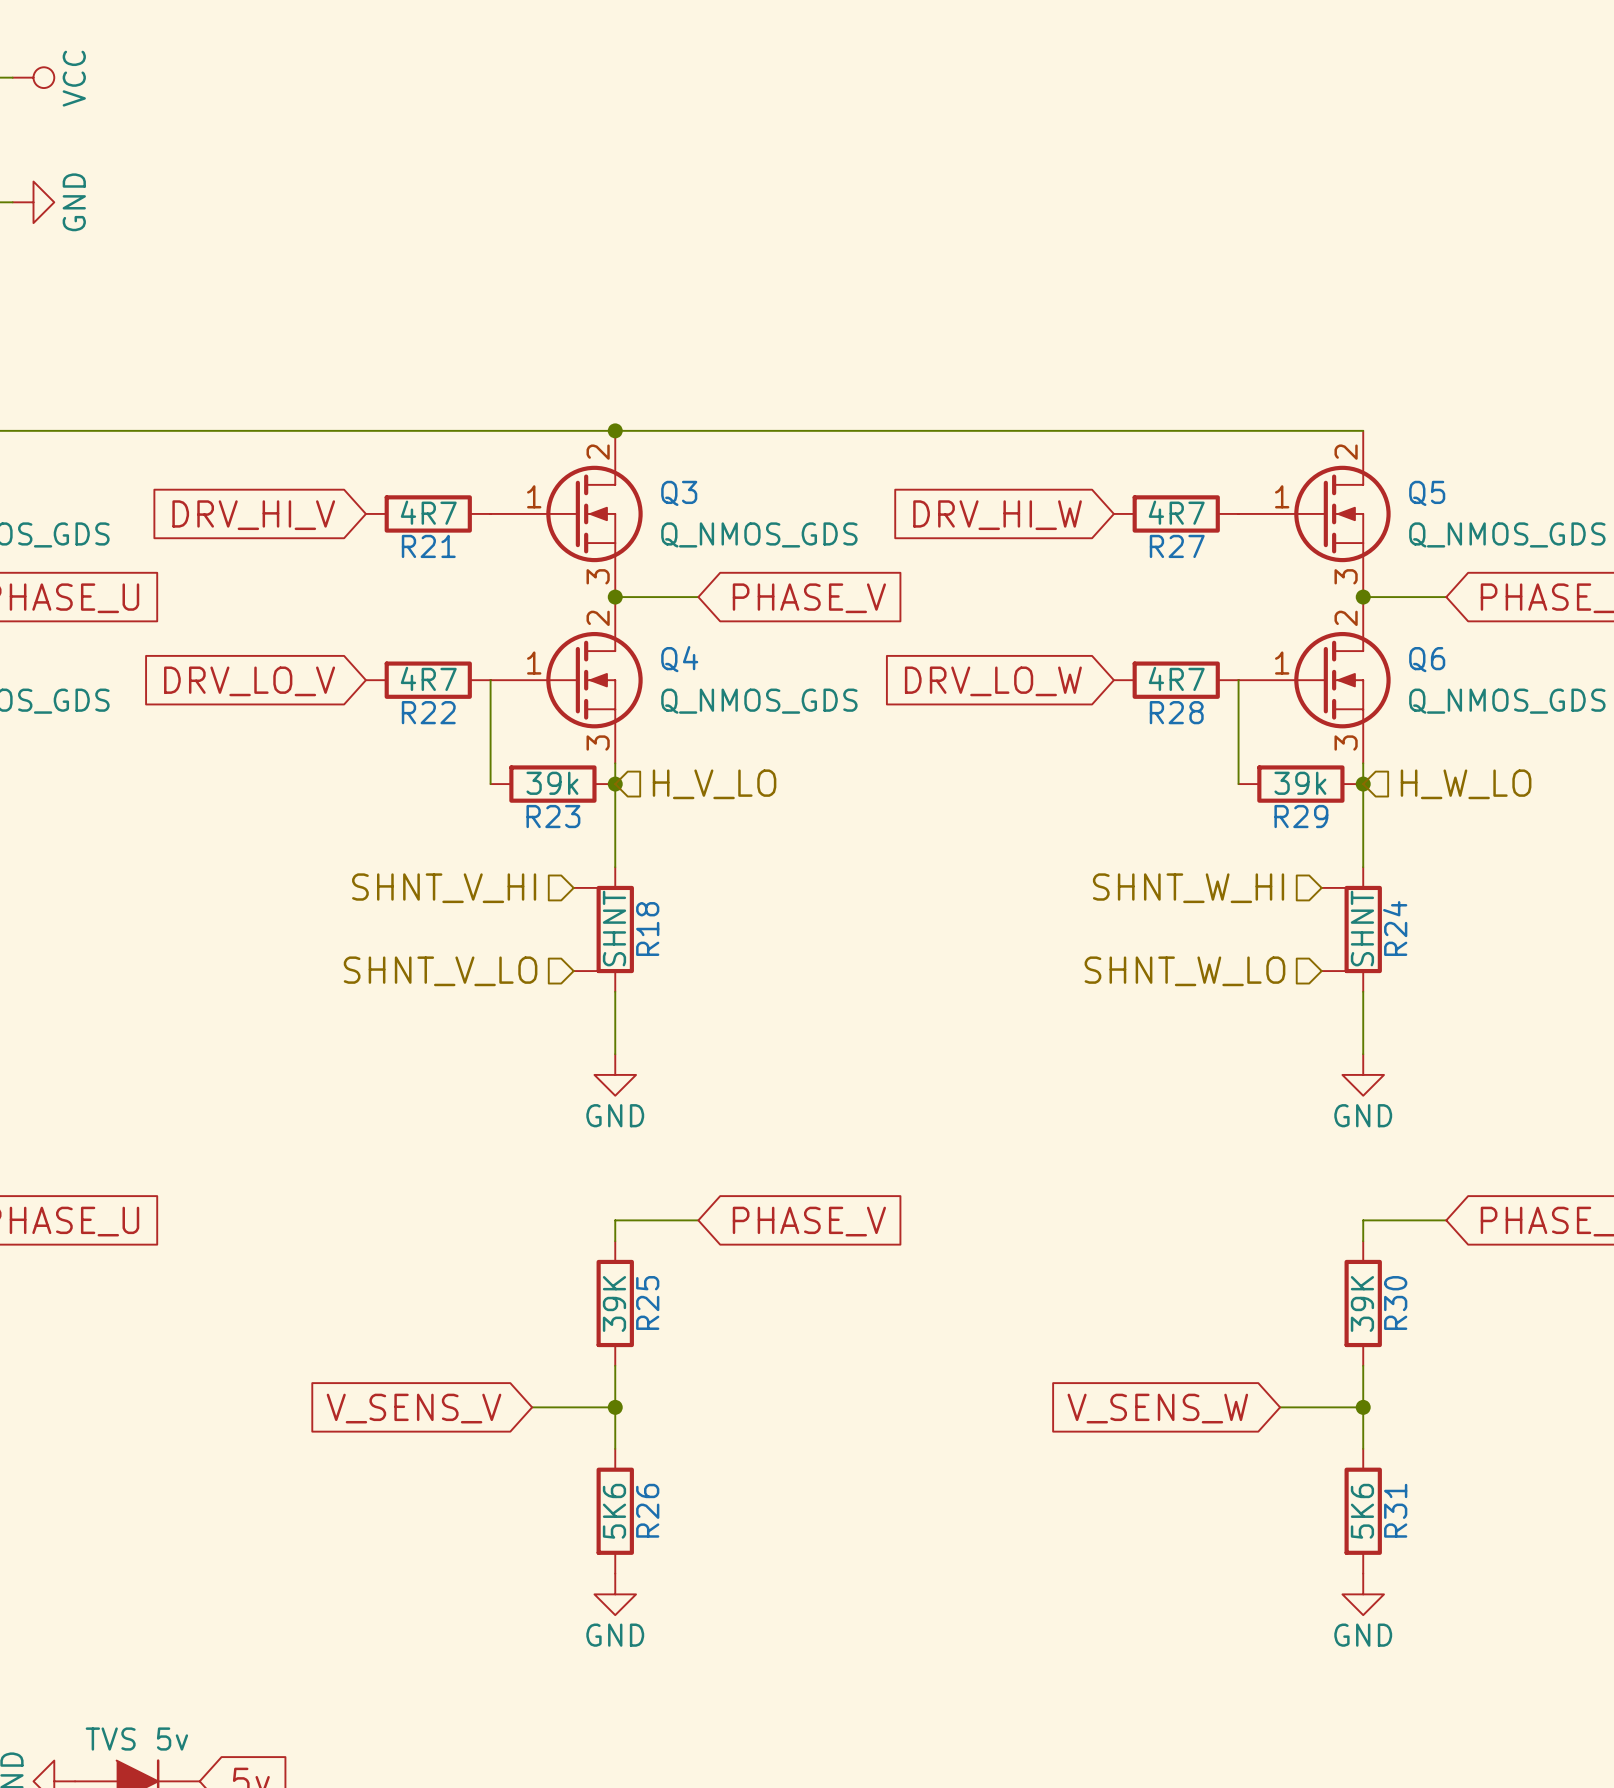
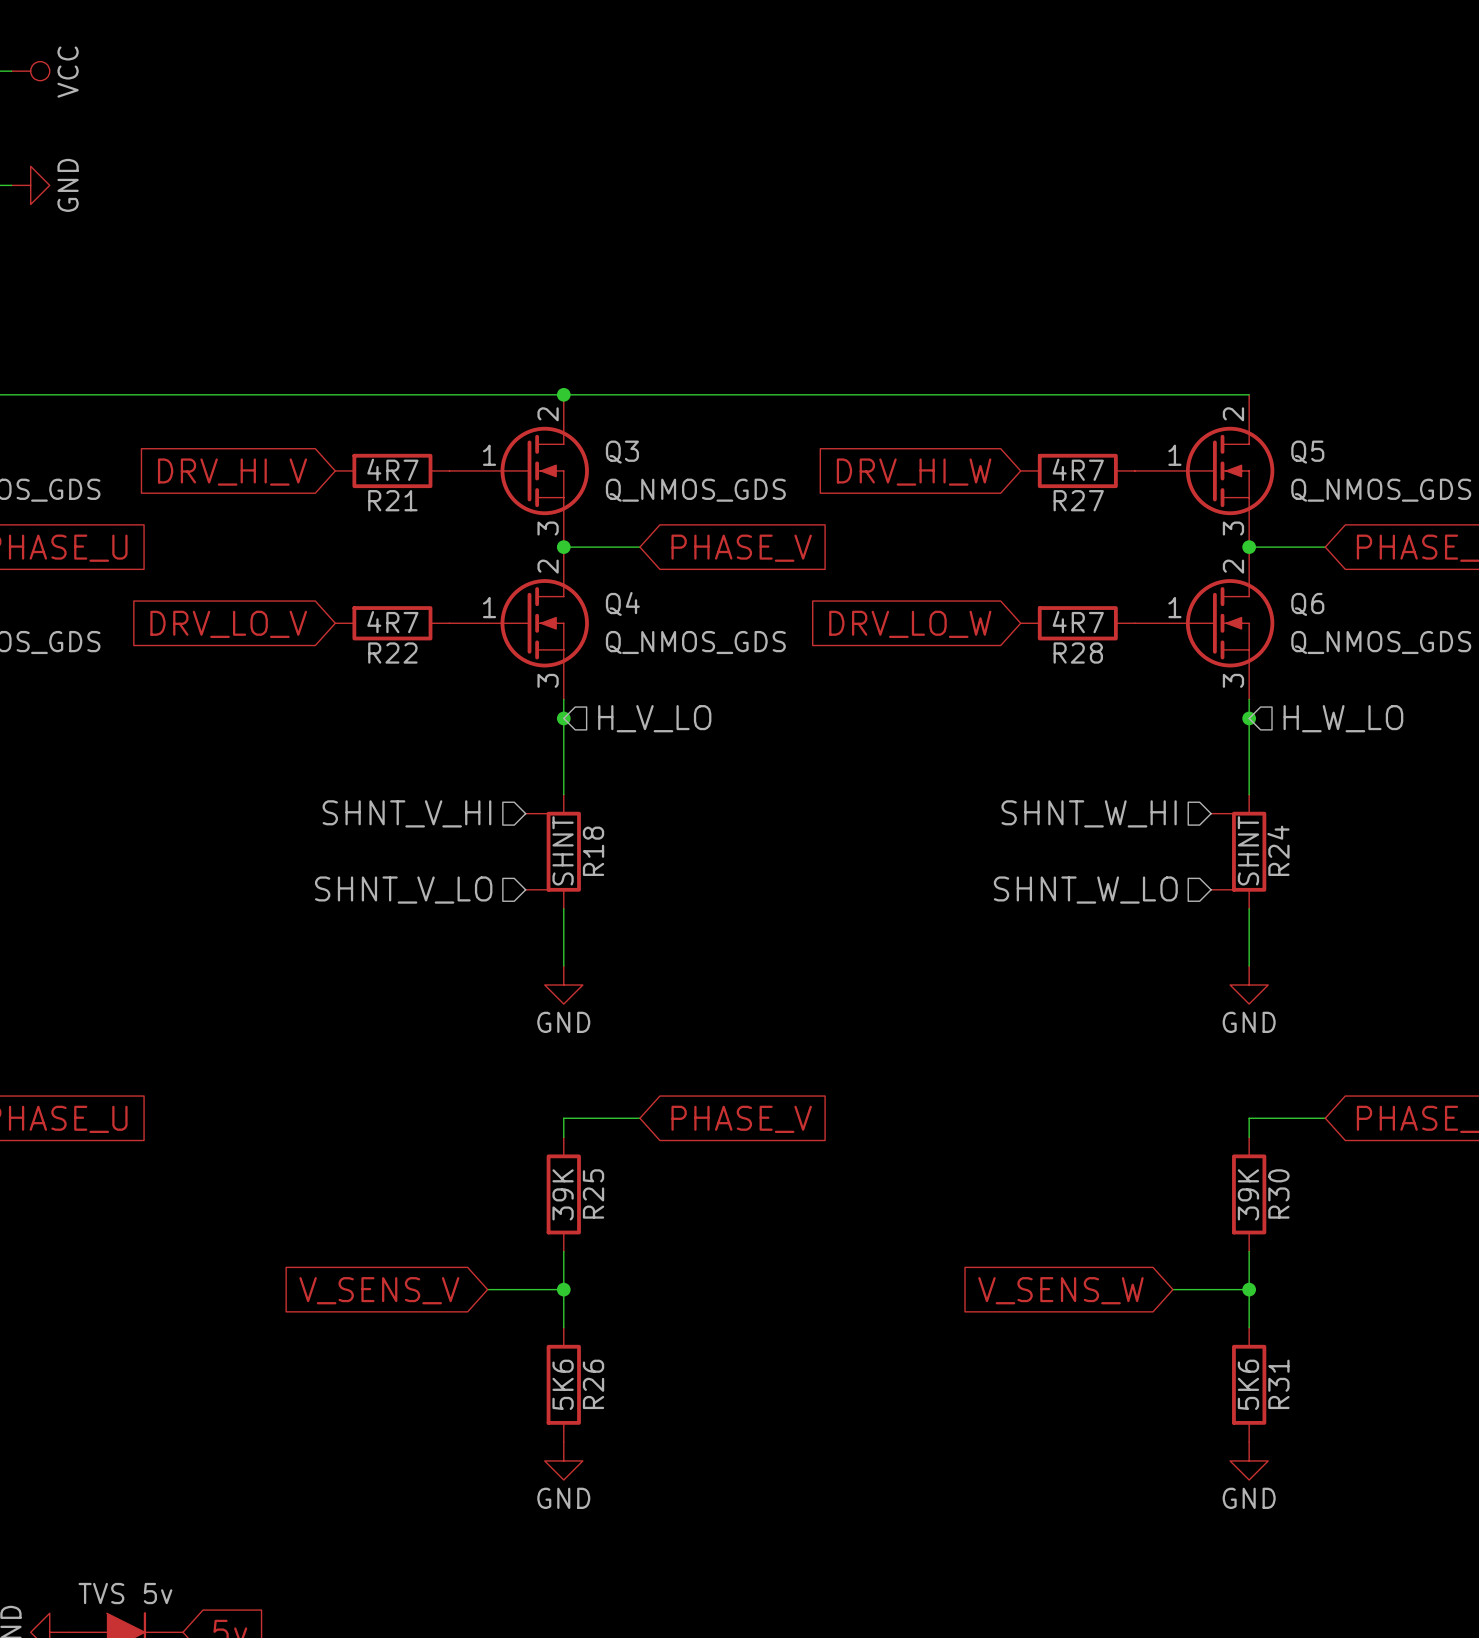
wire: (490, 680) (490, 784) -> none
wire: (1238, 680) (1238, 784) -> none
R23: 39k (552, 784) -> none
R29: 39k (1300, 784) -> none

